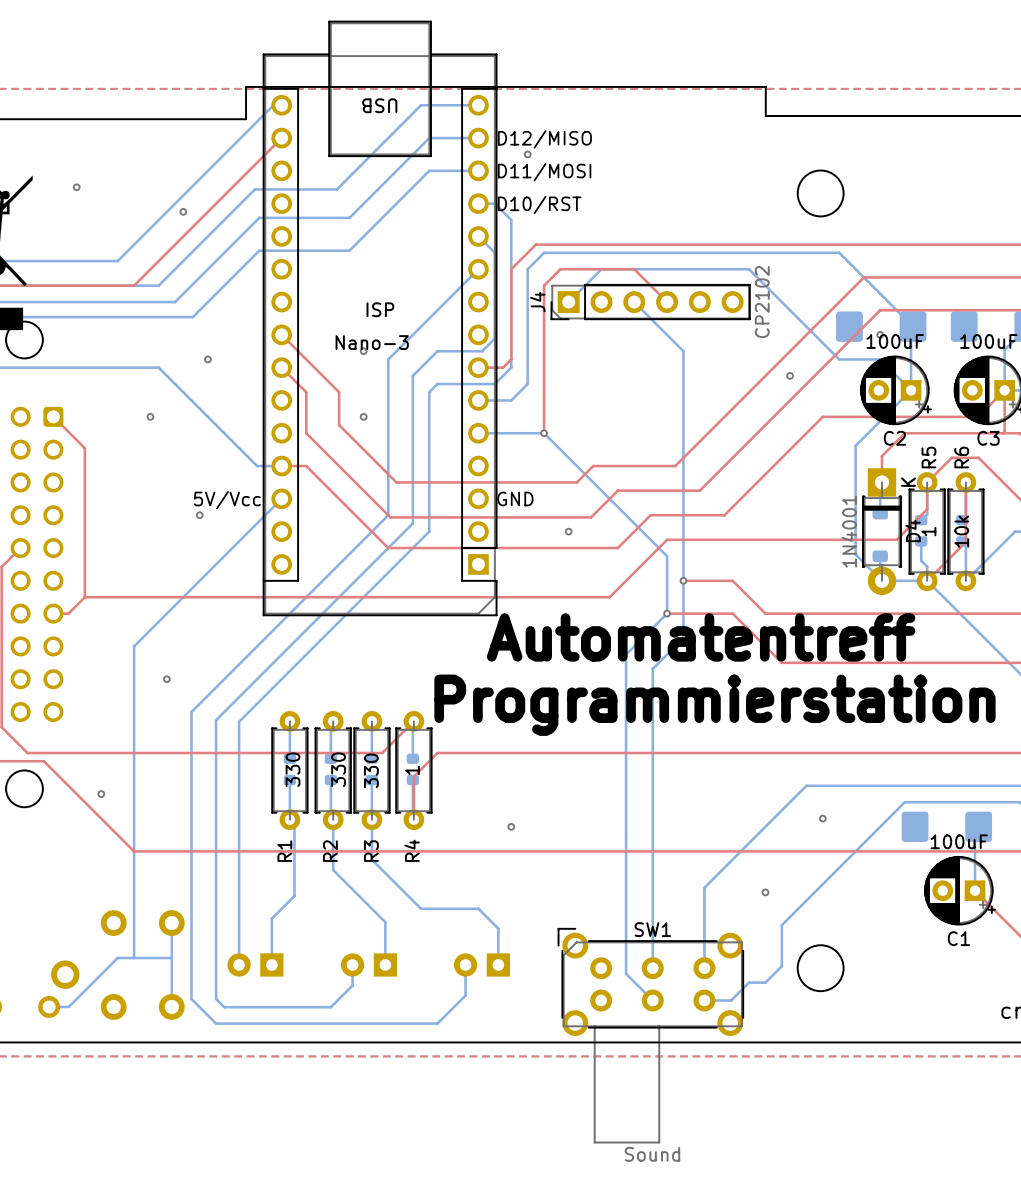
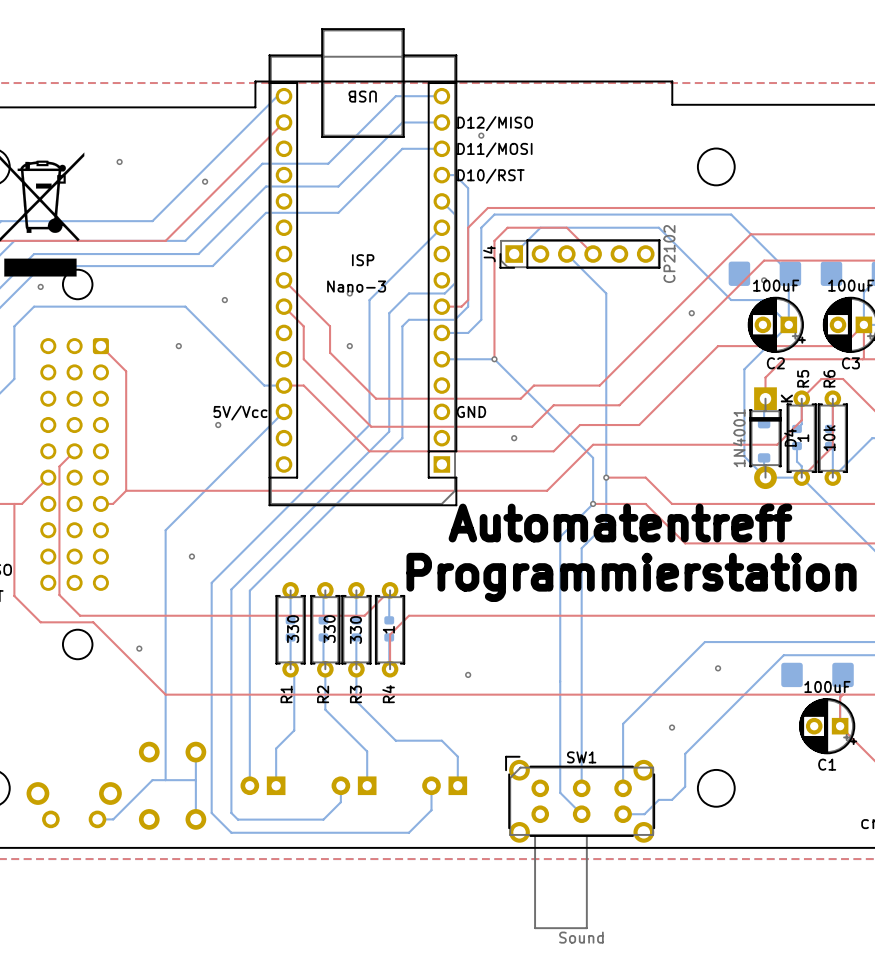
top track: none -> (843, 694) (840, 697) (840, 726)

